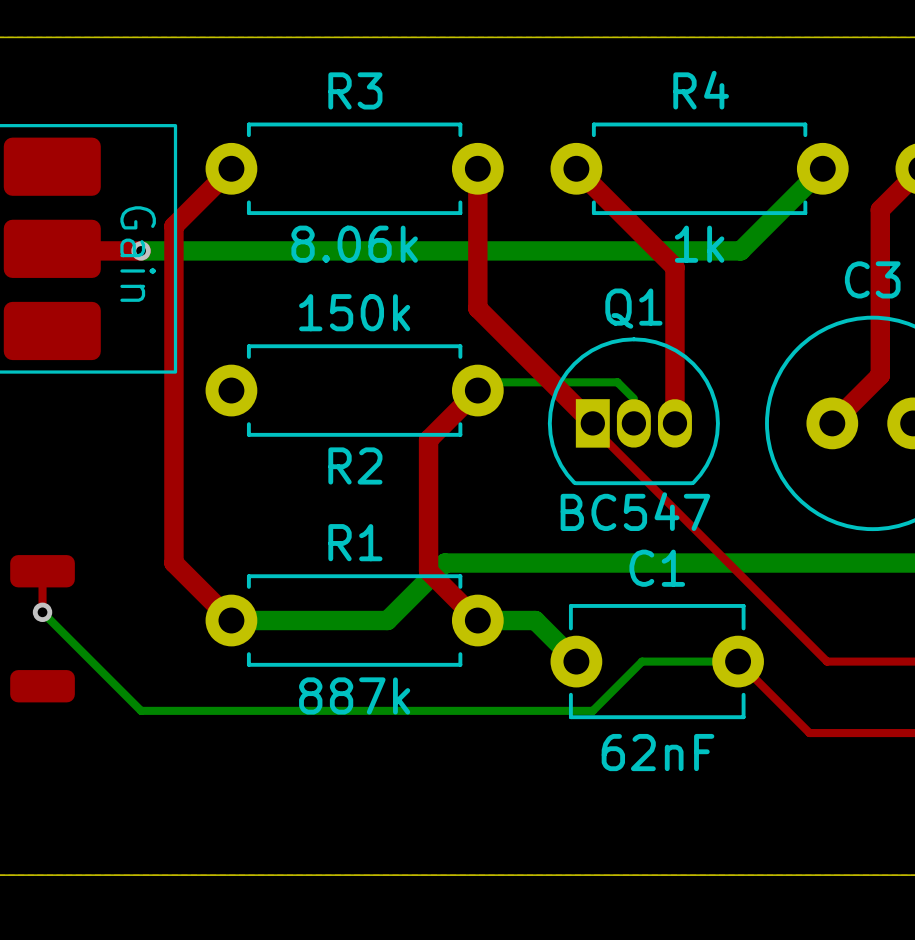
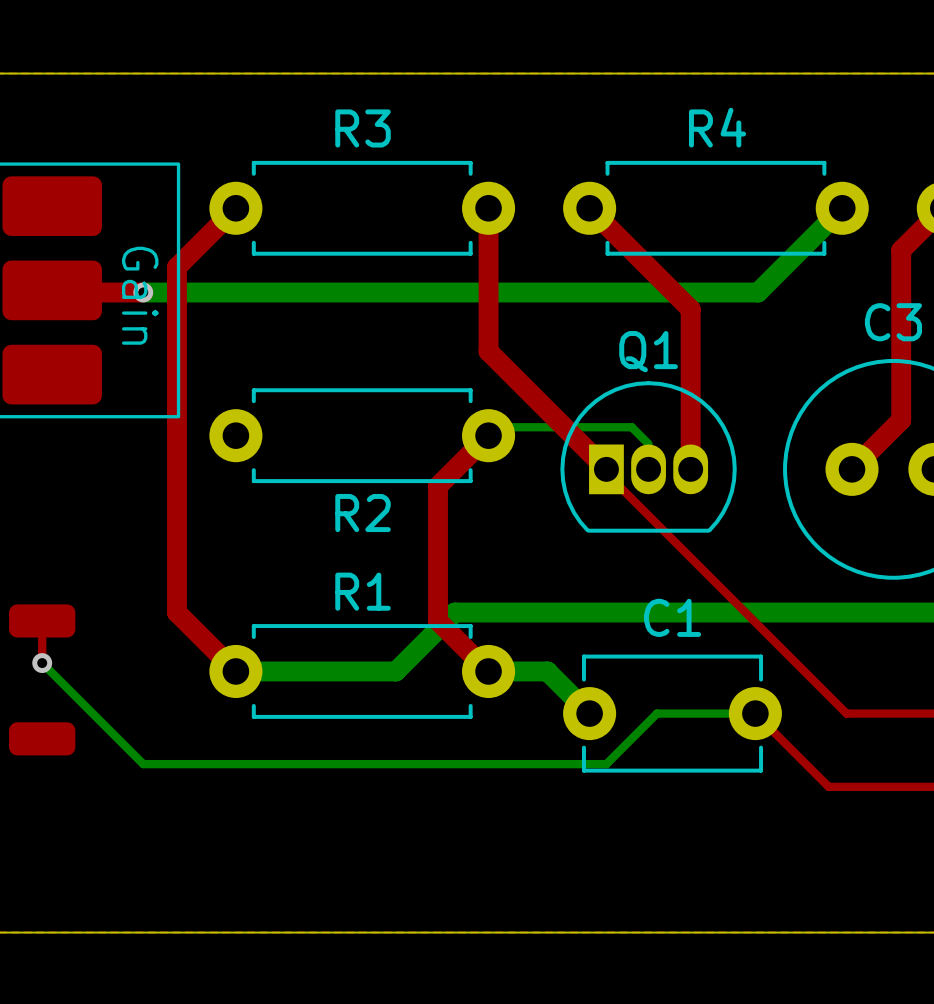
R3 value: 8.06k (354, 244) -> none
R4 value: 1k (699, 244) -> none
R2 value: 150k (354, 312) -> none
Q1 value: BC547 (635, 511) -> none
R1 value: 887k (354, 695) -> none
C1 value: 62nF (658, 752) -> none

